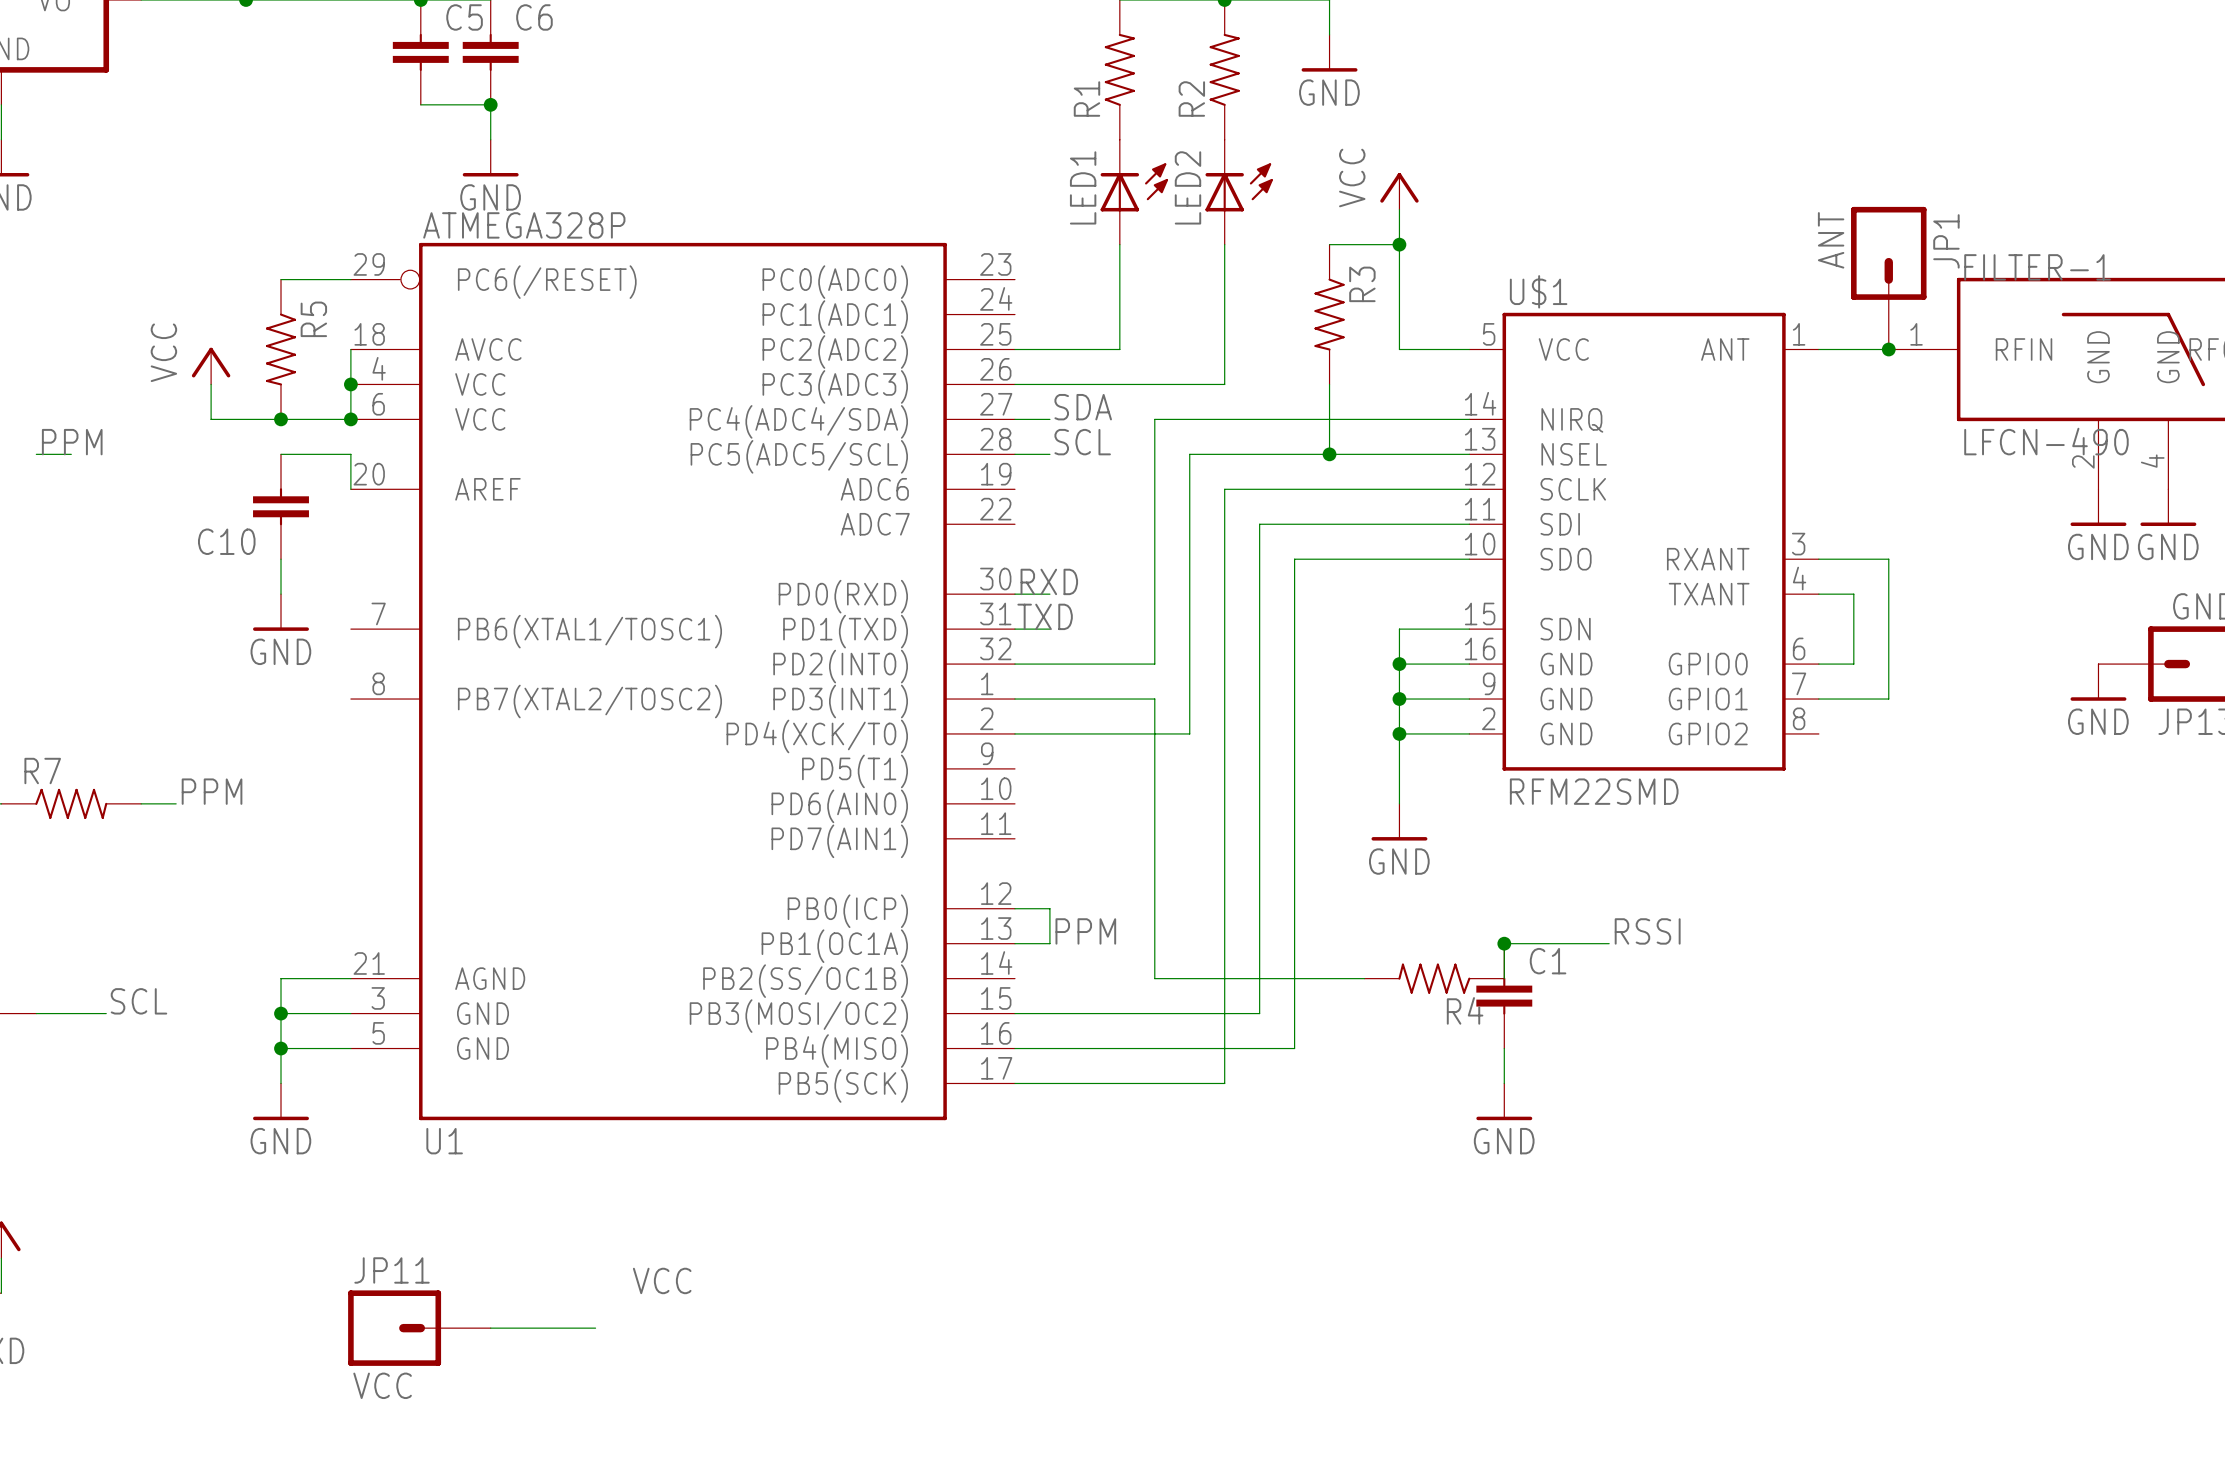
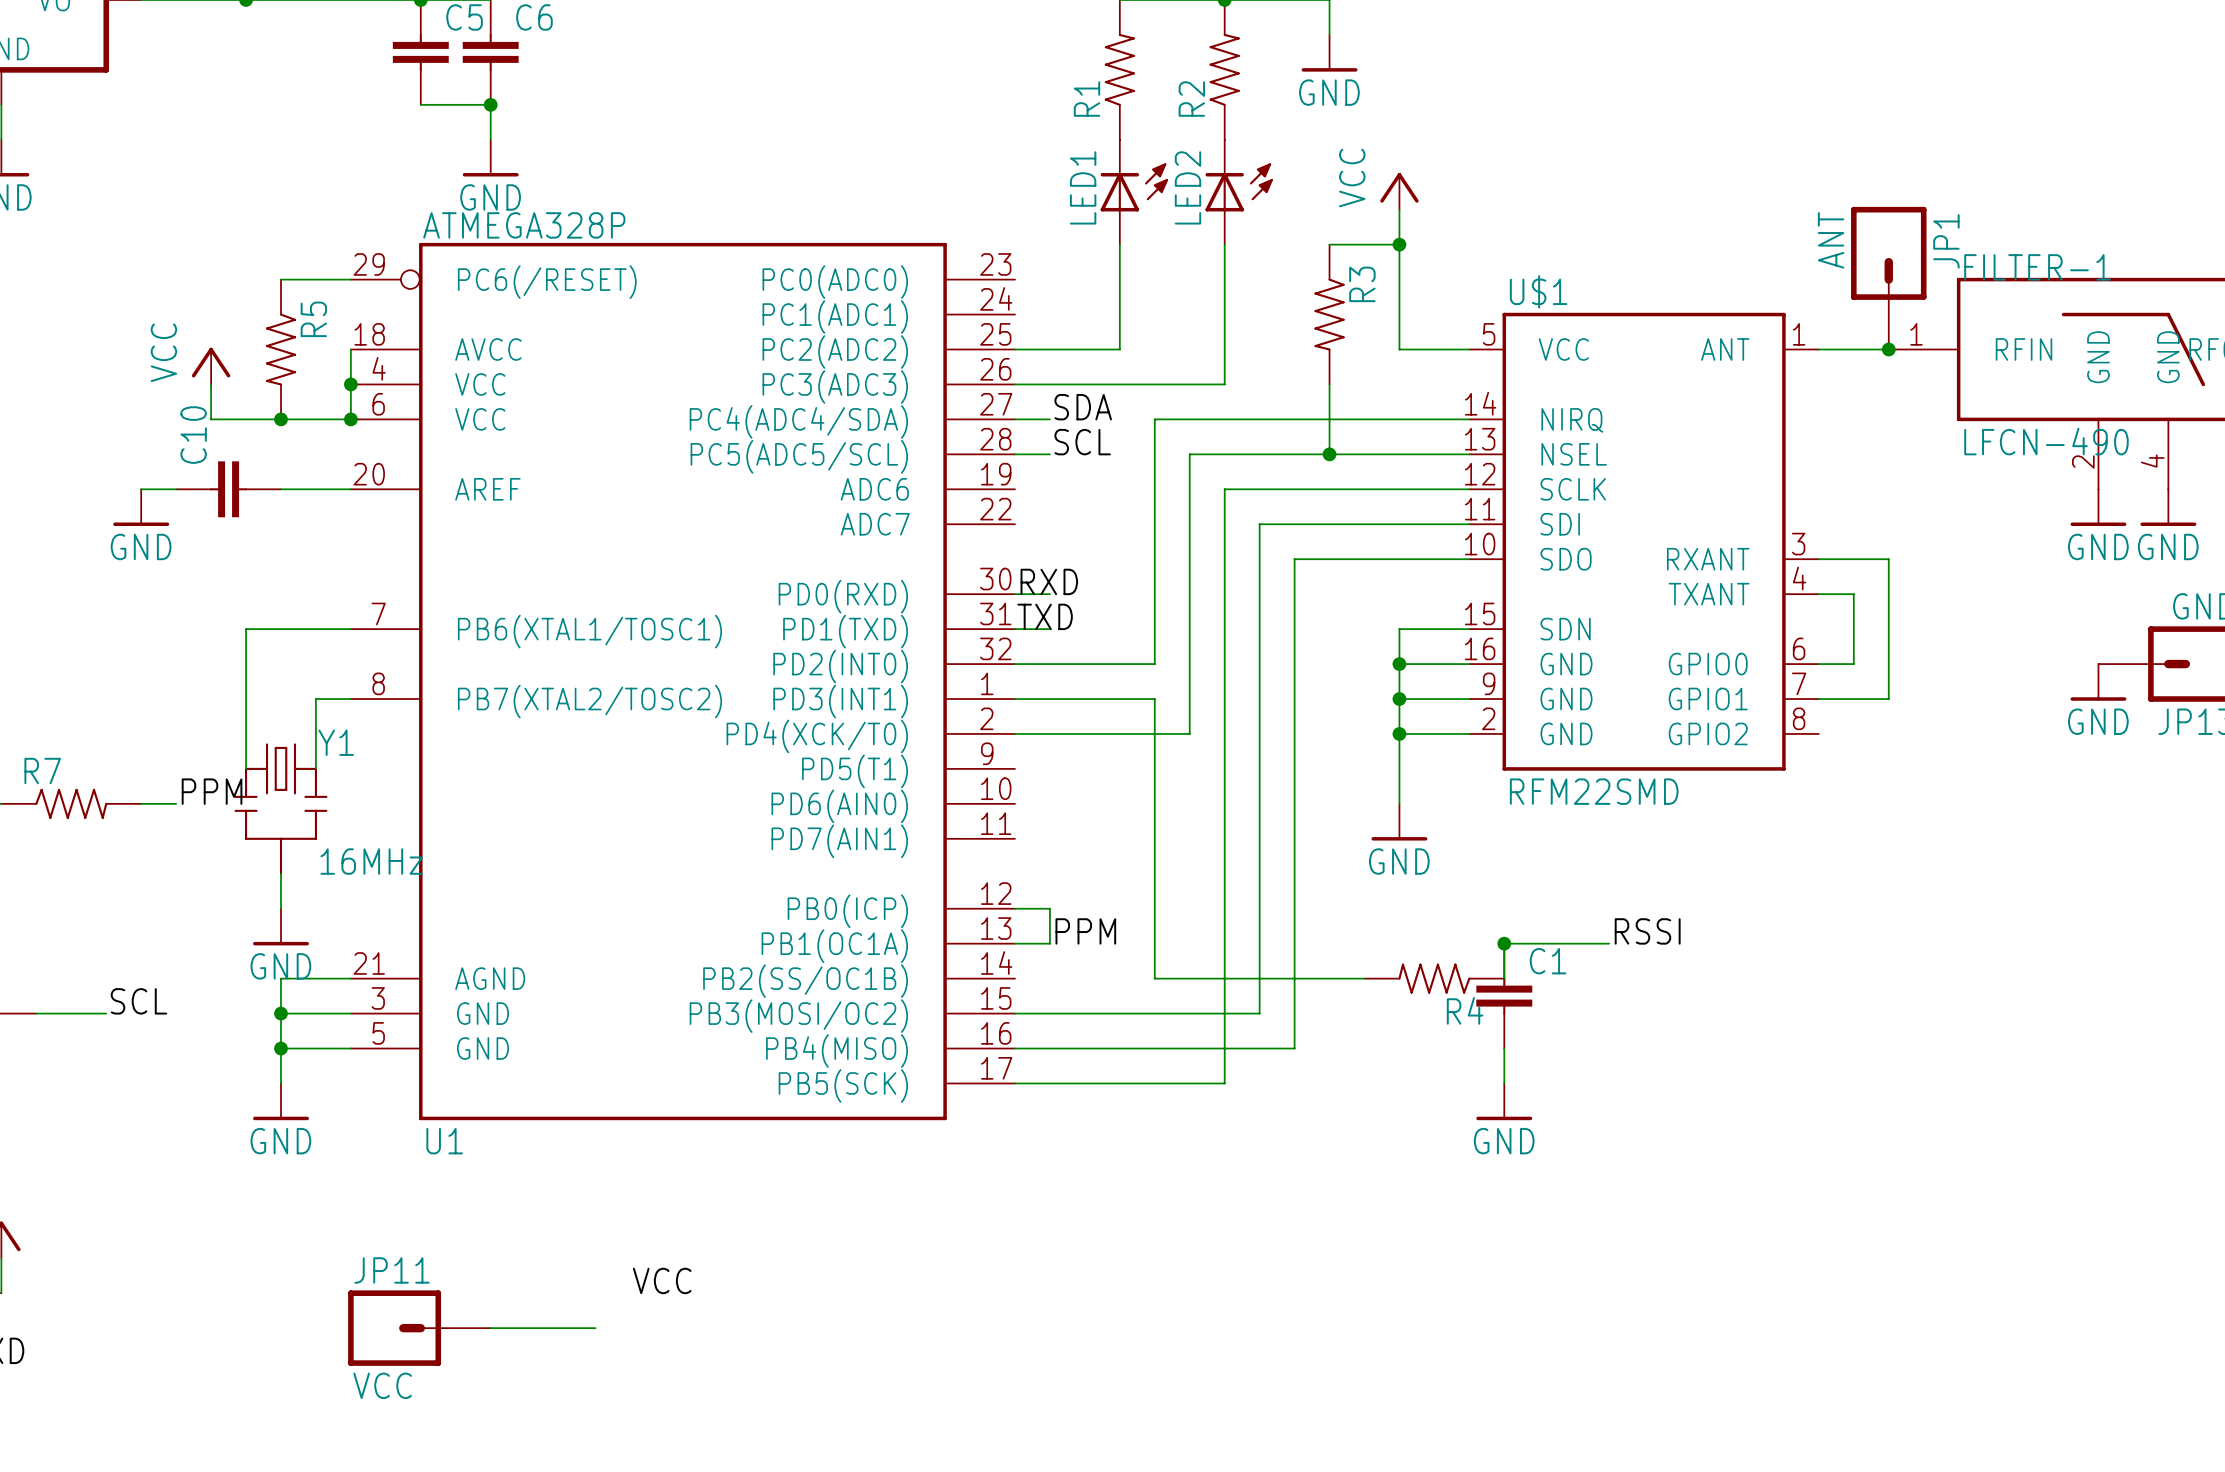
label: PPM (72, 442) -> none
wire: (36, 454) (71, 454) -> (141, 489) (176, 489)
wire: (281, 454) (350, 454) (350, 489) -> (281, 489) (350, 489)
C10 rotation: 0° (281, 506) -> 90° clockwise (228, 489)
power symbol: none -> GND (141, 507)
wire: (281, 559) (281, 594) -> (281, 873) (281, 908)
power symbol: GND (281, 612) -> none
wire: none -> (350, 629) (246, 629) (246, 768)
wire: none -> (350, 699) (315, 699) (315, 768)
Y1: none -> 16MHz (281, 809)
power symbol: none -> GND (281, 927)

